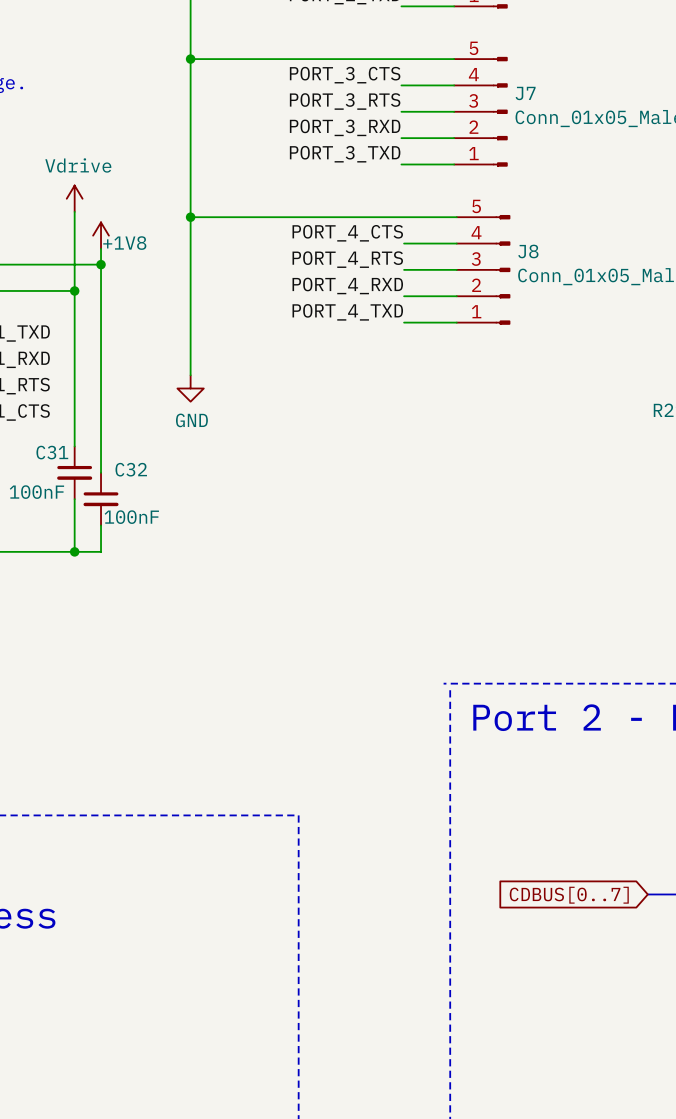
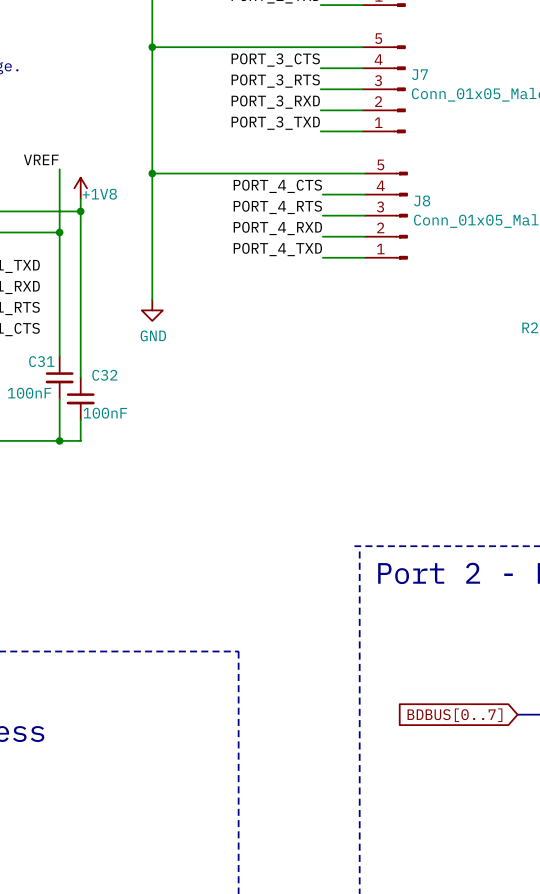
power symbol: Vdrive (74, 198) -> none
label: none -> VREF (41, 159)
global label: CDBUS[0..7] (569, 895) -> BDBUS[0..7] (454, 715)

